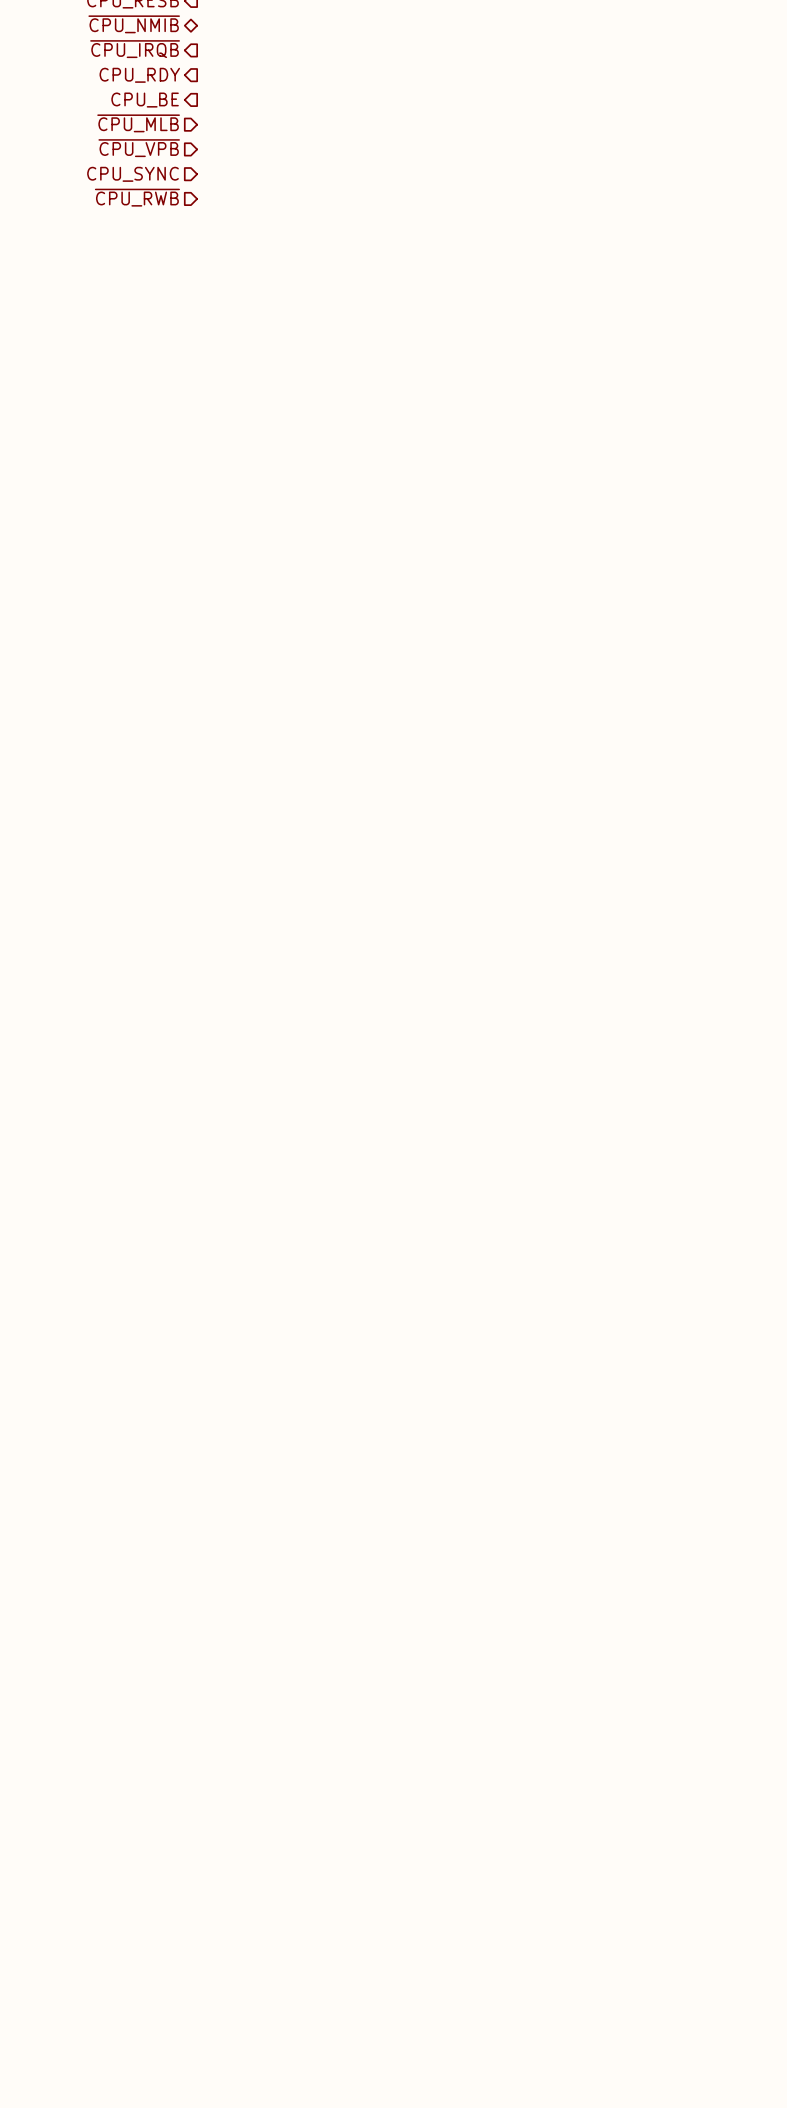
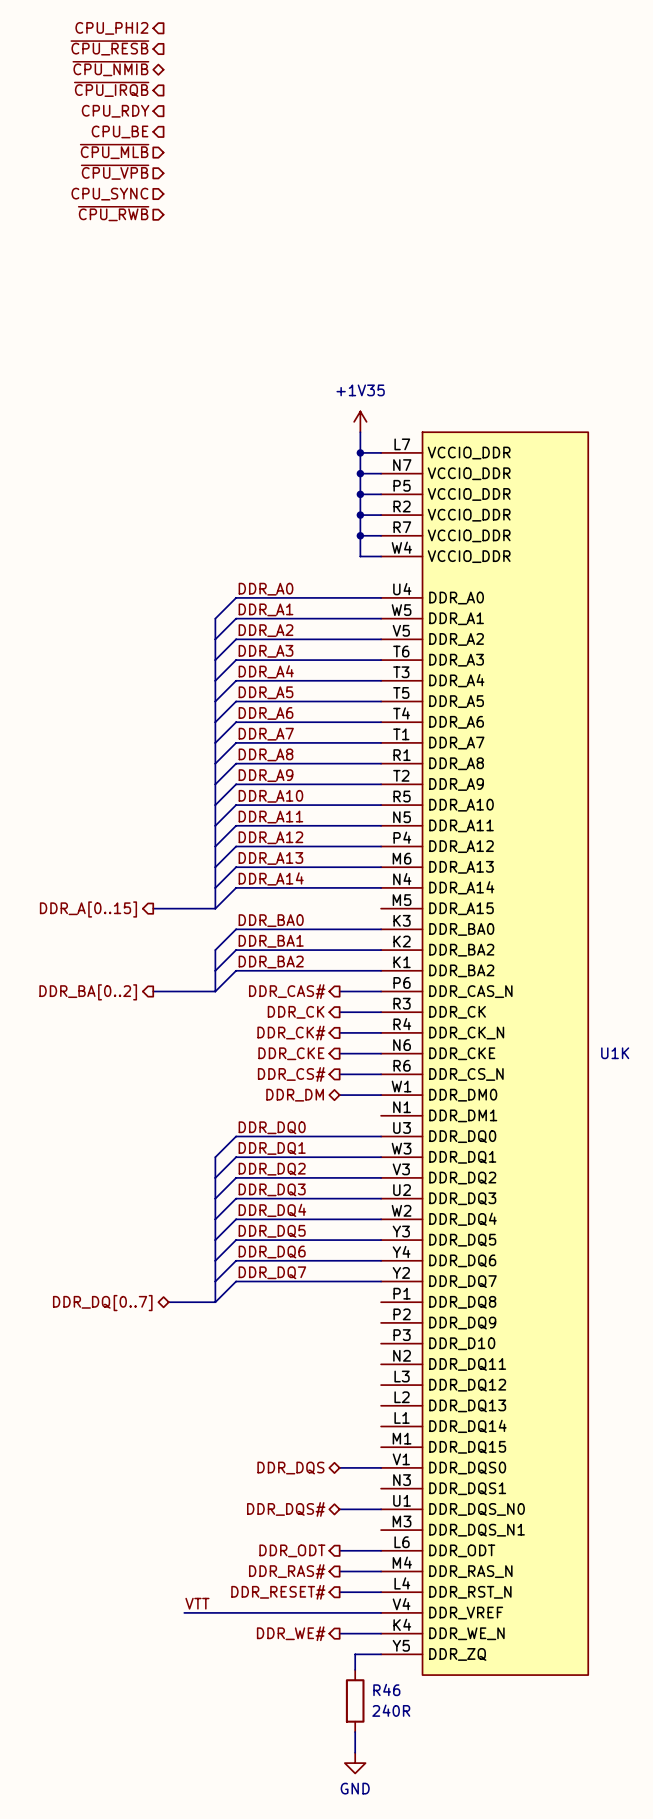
power symbol: none -> +1V35 (360, 421)
wire: none -> (360, 432) (360, 556) (381, 556)
wire: none -> (360, 452) (381, 452)
junction: none -> (360, 452)
wire: none -> (360, 473) (381, 473)
junction: none -> (360, 473)
wire: none -> (360, 494) (381, 494)
junction: none -> (360, 494)
wire: none -> (360, 515) (381, 515)
junction: none -> (360, 515)
wire: none -> (360, 535) (381, 535)
junction: none -> (360, 535)
label: none -> DDR_A0 (266, 589)
wire: none -> (381, 597) (236, 597) (215, 618)
label: none -> DDR_A1 (266, 609)
bus: none -> (215, 618) (215, 908) (153, 908)
wire: none -> (381, 618) (236, 618) (215, 639)
label: none -> DDR_A2 (266, 630)
wire: none -> (381, 639) (236, 639) (215, 660)
label: none -> DDR_A3 (266, 651)
wire: none -> (381, 660) (236, 660) (215, 680)
label: none -> DDR_A4 (266, 671)
wire: none -> (381, 680) (236, 680) (215, 701)
label: none -> DDR_A5 (266, 692)
wire: none -> (381, 701) (236, 701) (215, 722)
label: none -> DDR_A6 (266, 713)
wire: none -> (381, 722) (236, 722) (215, 742)
label: none -> DDR_A7 (266, 734)
wire: none -> (381, 742) (236, 742) (215, 763)
label: none -> DDR_A8 (266, 754)
wire: none -> (381, 763) (236, 763) (215, 784)
label: none -> DDR_A9 (266, 775)
wire: none -> (381, 784) (236, 784) (215, 805)
label: none -> DDR_A10 (270, 796)
wire: none -> (381, 805) (236, 805) (215, 825)
label: none -> DDR_A11 (270, 817)
wire: none -> (381, 825) (236, 825) (215, 846)
label: none -> DDR_A12 (270, 837)
wire: none -> (381, 846) (236, 846) (215, 867)
label: none -> DDR_A13 (270, 858)
wire: none -> (381, 867) (236, 867) (215, 887)
label: none -> DDR_A14 (271, 878)
wire: none -> (381, 887) (236, 887) (215, 908)
hierarchical label: none -> DDR_A[0..15] (88, 909)
label: none -> DDR_BA0 (271, 920)
wire: none -> (381, 929) (236, 929) (215, 950)
label: none -> DDR_BA1 (271, 941)
bus: none -> (215, 950) (215, 991) (153, 991)
wire: none -> (381, 950) (236, 950) (215, 970)
label: none -> DDR_BA2 (271, 962)
wire: none -> (381, 970) (236, 970) (215, 991)
hierarchical label: none -> DDR_CAS# (287, 991)
wire: none -> (339, 991) (381, 991)
hierarchical label: none -> DDR_BA[0..2] (88, 992)
hierarchical label: none -> DDR_CK (296, 1012)
wire: none -> (339, 1012) (381, 1012)
hierarchical label: none -> DDR_CK# (291, 1033)
wire: none -> (339, 1032) (381, 1032)
hierarchical label: none -> DDR_CKE (291, 1053)
wire: none -> (339, 1053) (381, 1053)
U1K: none -> (484, 1053)
hierarchical label: none -> DDR_CS# (291, 1074)
wire: none -> (339, 1074) (381, 1074)
hierarchical label: none -> DDR_DM (295, 1095)
wire: none -> (339, 1095) (381, 1095)
label: none -> DDR_DQ0 (272, 1127)
wire: none -> (381, 1136) (236, 1136) (215, 1157)
label: none -> DDR_DQ1 (272, 1148)
bus: none -> (215, 1157) (215, 1302) (168, 1302)
wire: none -> (381, 1157) (236, 1157) (215, 1177)
label: none -> DDR_DQ2 (272, 1169)
wire: none -> (381, 1177) (236, 1177) (215, 1198)
label: none -> DDR_DQ3 (272, 1189)
wire: none -> (381, 1198) (236, 1198) (215, 1219)
label: none -> DDR_DQ4 (272, 1210)
wire: none -> (381, 1219) (236, 1219) (215, 1240)
label: none -> DDR_DQ5 (272, 1231)
wire: none -> (381, 1240) (236, 1240) (215, 1260)
label: none -> DDR_DQ6 (272, 1252)
wire: none -> (381, 1260) (236, 1260) (215, 1281)
label: none -> DDR_DQ7 (272, 1272)
wire: none -> (381, 1281) (236, 1281) (215, 1302)
hierarchical label: none -> DDR_DQ[0..7] (102, 1303)
hierarchical label: none -> DDR_DQS (290, 1468)
wire: none -> (339, 1467) (381, 1467)
hierarchical label: none -> DDR_DQS# (286, 1509)
wire: none -> (339, 1509) (381, 1509)
hierarchical label: none -> DDR_ODT (292, 1550)
wire: none -> (339, 1550) (381, 1550)
hierarchical label: none -> DDR_RAS# (287, 1571)
wire: none -> (339, 1571) (381, 1571)
hierarchical label: none -> DDR_RESET# (278, 1592)
wire: none -> (339, 1592) (381, 1592)
label: none -> VTT (197, 1603)
wire: none -> (184, 1612) (381, 1612)
hierarchical label: none -> DDR_WE# (291, 1633)
wire: none -> (339, 1633) (381, 1633)
wire: none -> (381, 1654) (355, 1654) (355, 1669)
R46: none -> 240R (355, 1700)
wire: none -> (355, 1732) (355, 1752)
power symbol: none -> GND (355, 1763)

